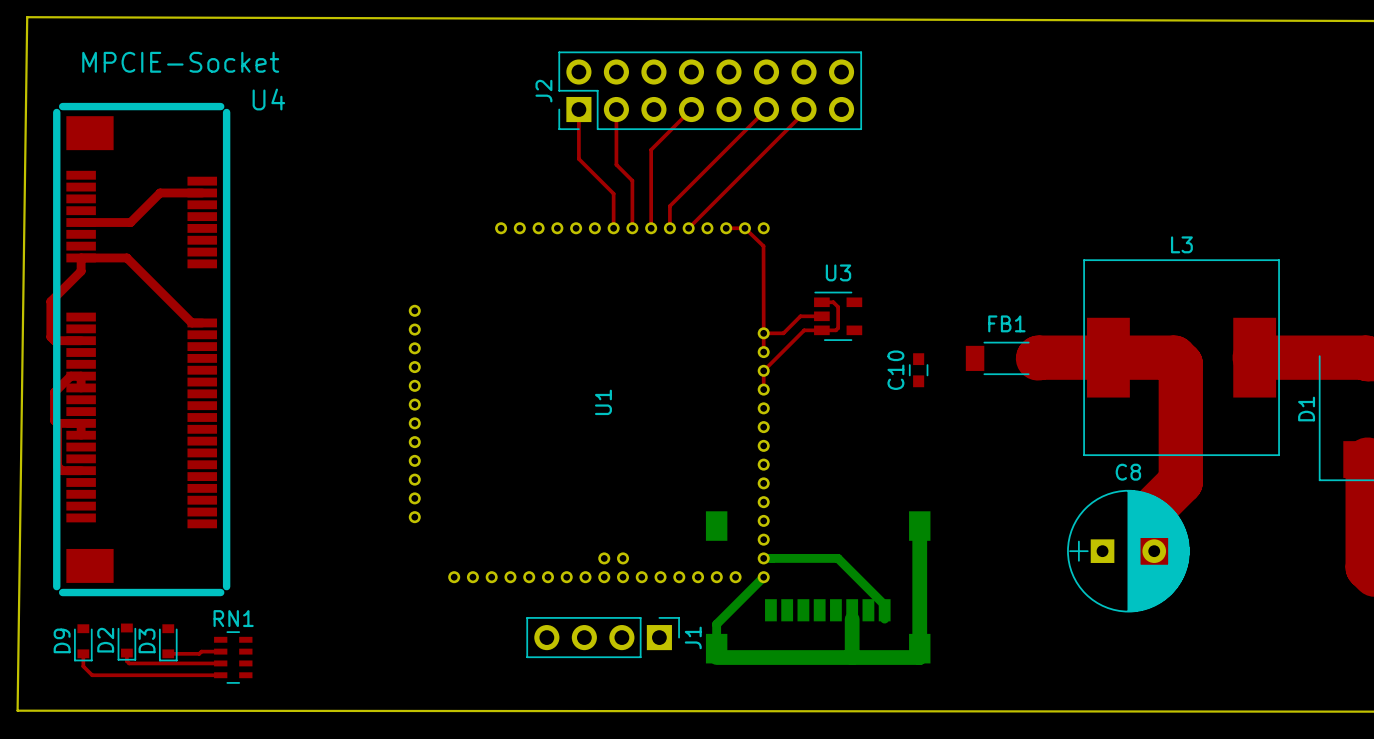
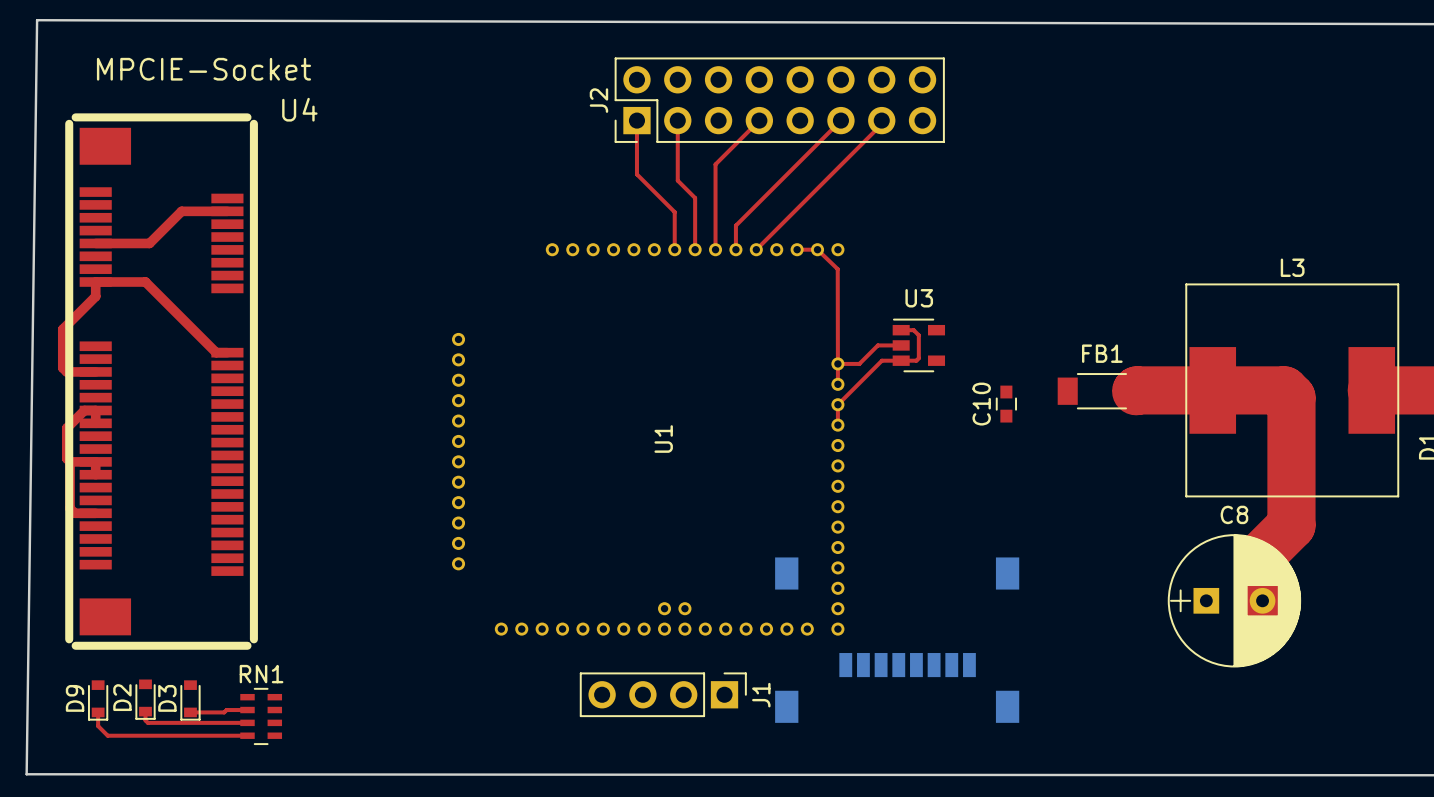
bottom track: (919, 534) (919, 657) (716, 657) (716, 624) (763, 577) -> none
bottom track: (763, 558) (838, 558) (884, 605) (884, 619) -> none
bottom track: (852, 619) (852, 657) -> none

